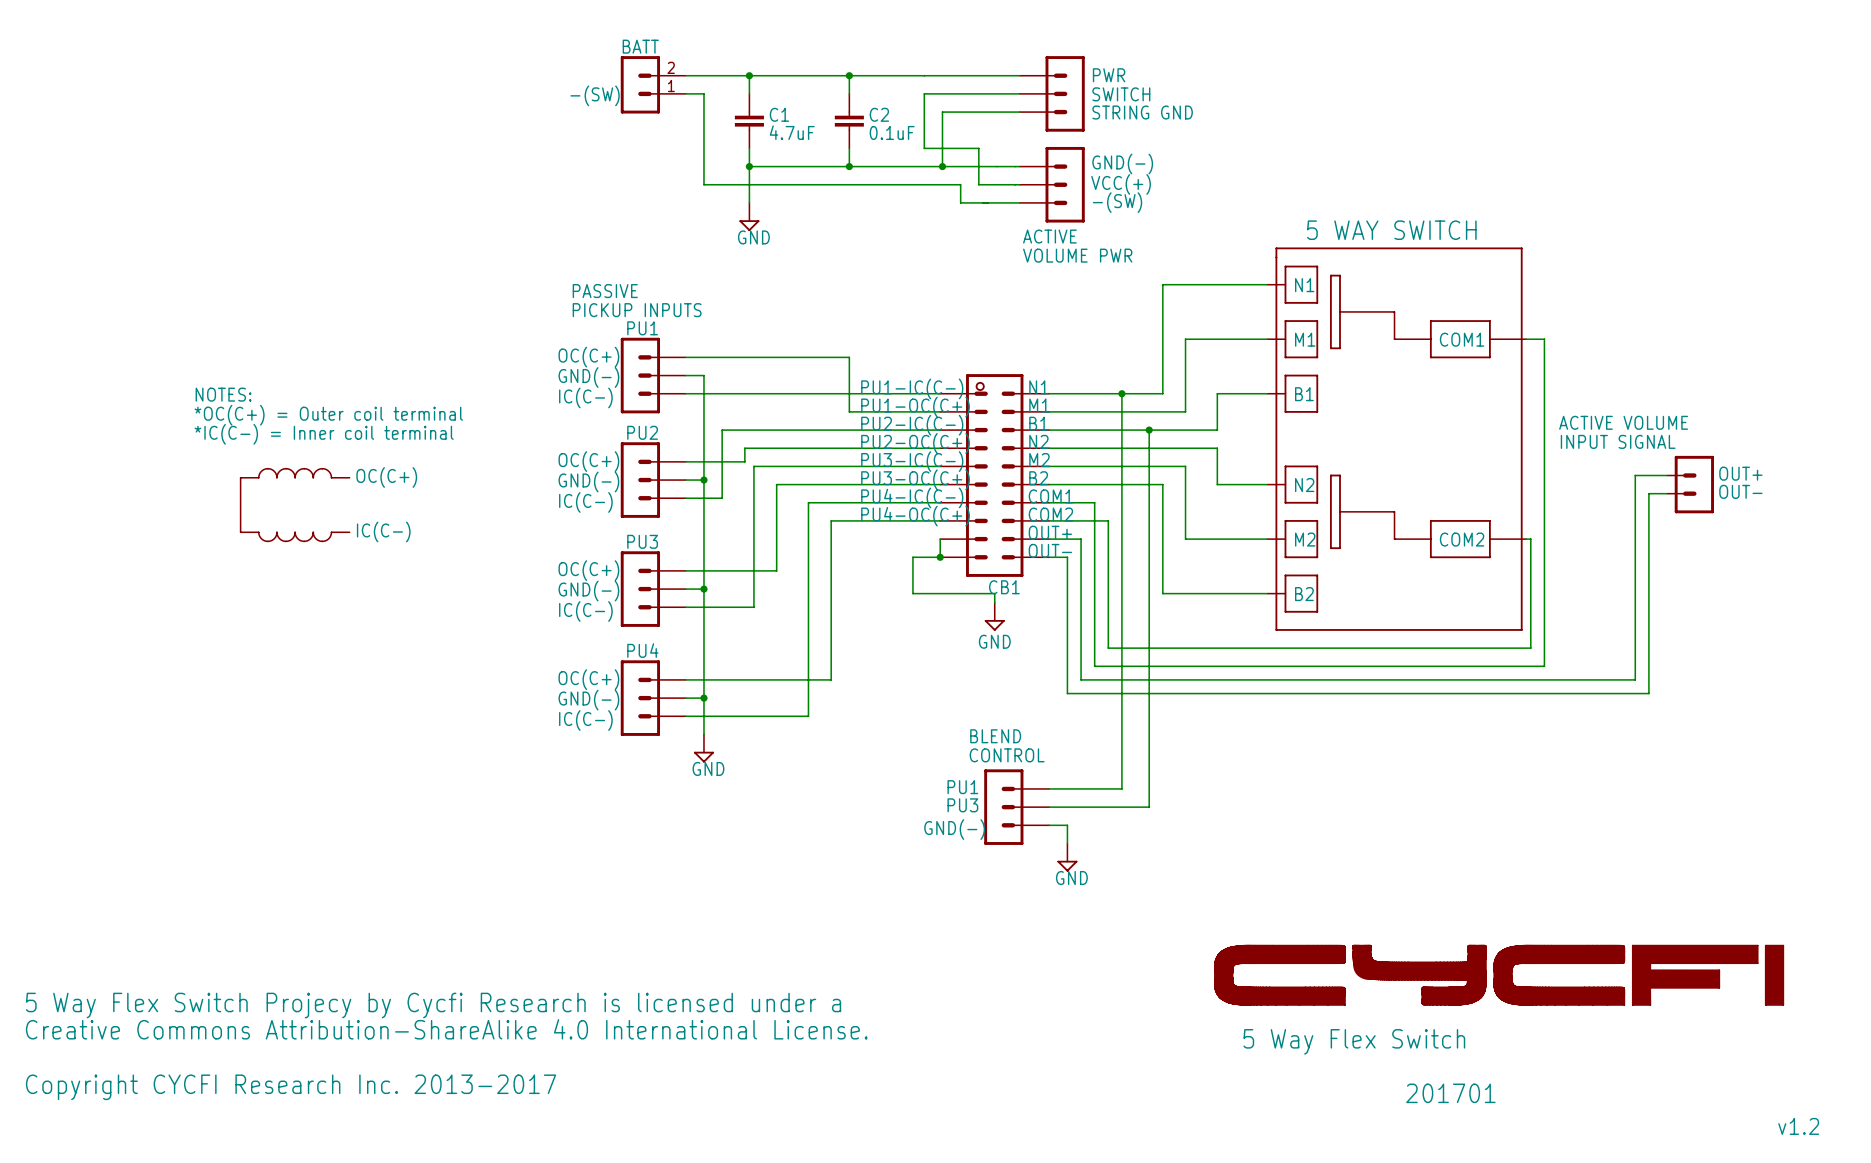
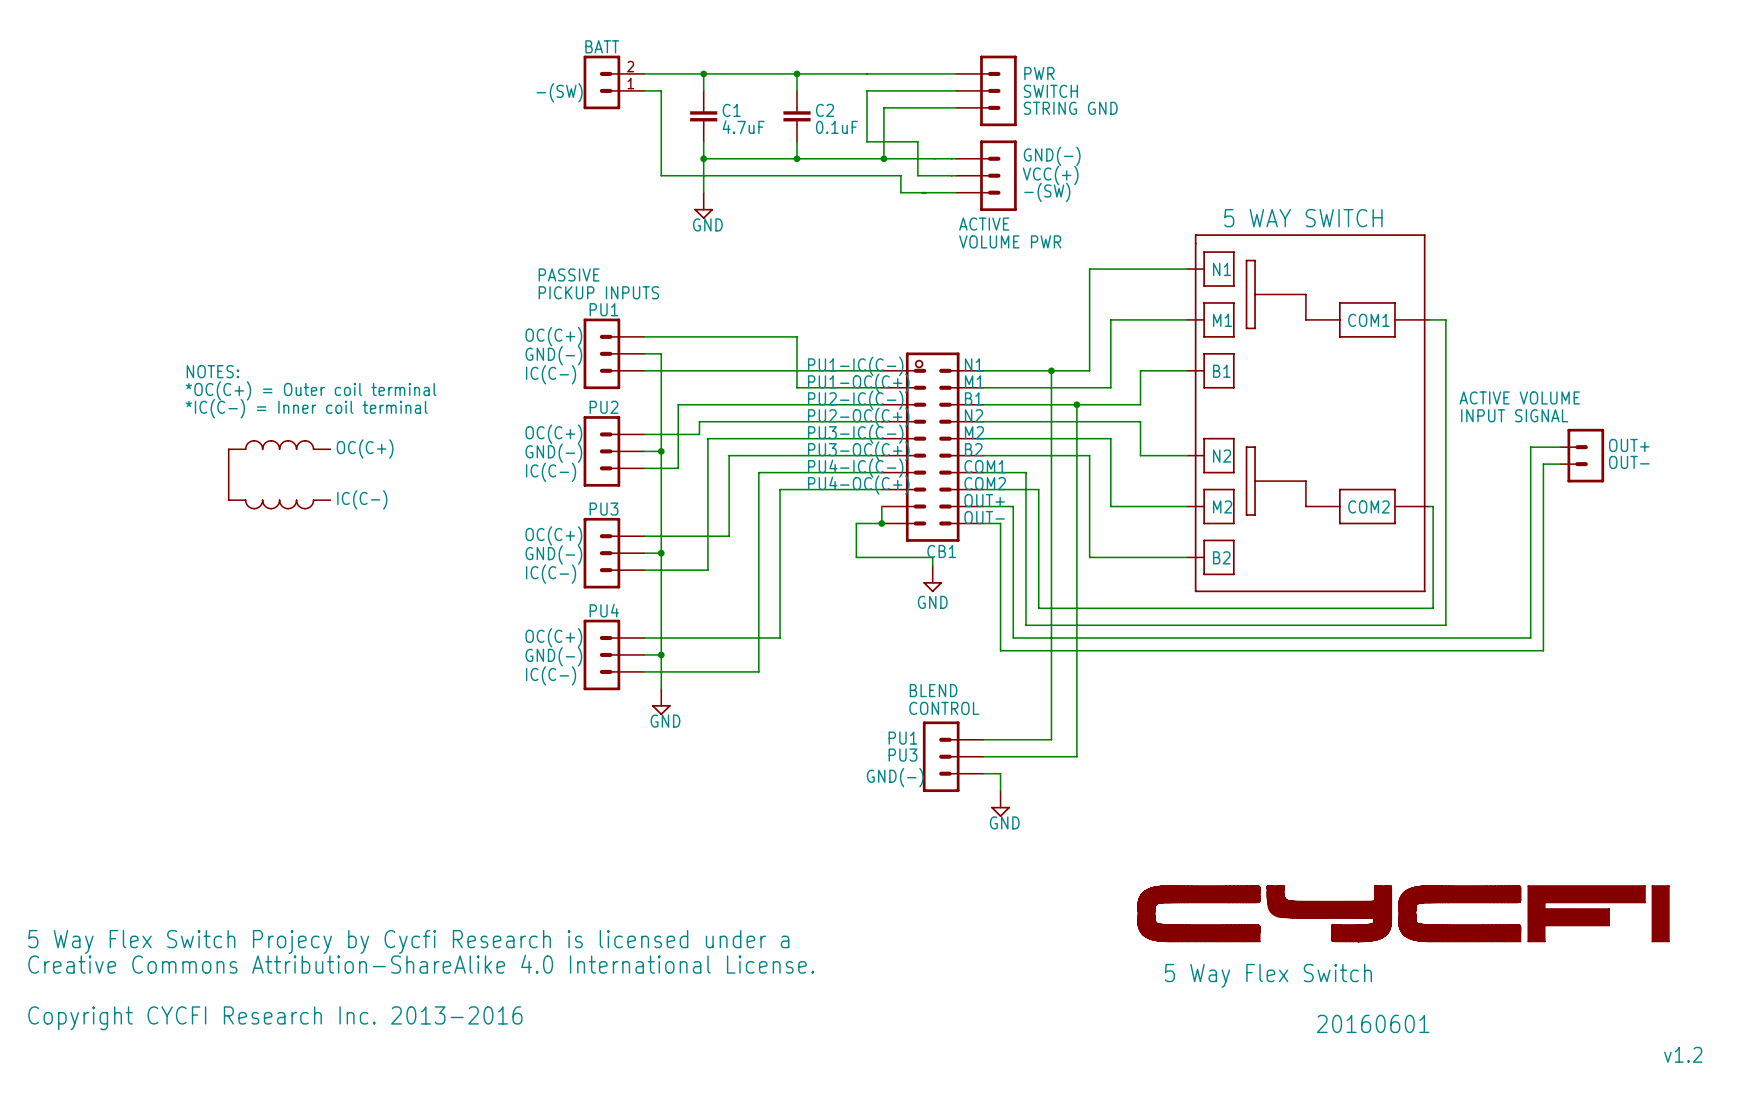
text: Copyright CYCFI Research Inc. 2013-2017 (291, 1087) -> Copyright CYCFI Research Inc. 2013-2016 (275, 1018)
text: 201701 (1450, 1093) -> 20160601 (1373, 1023)

